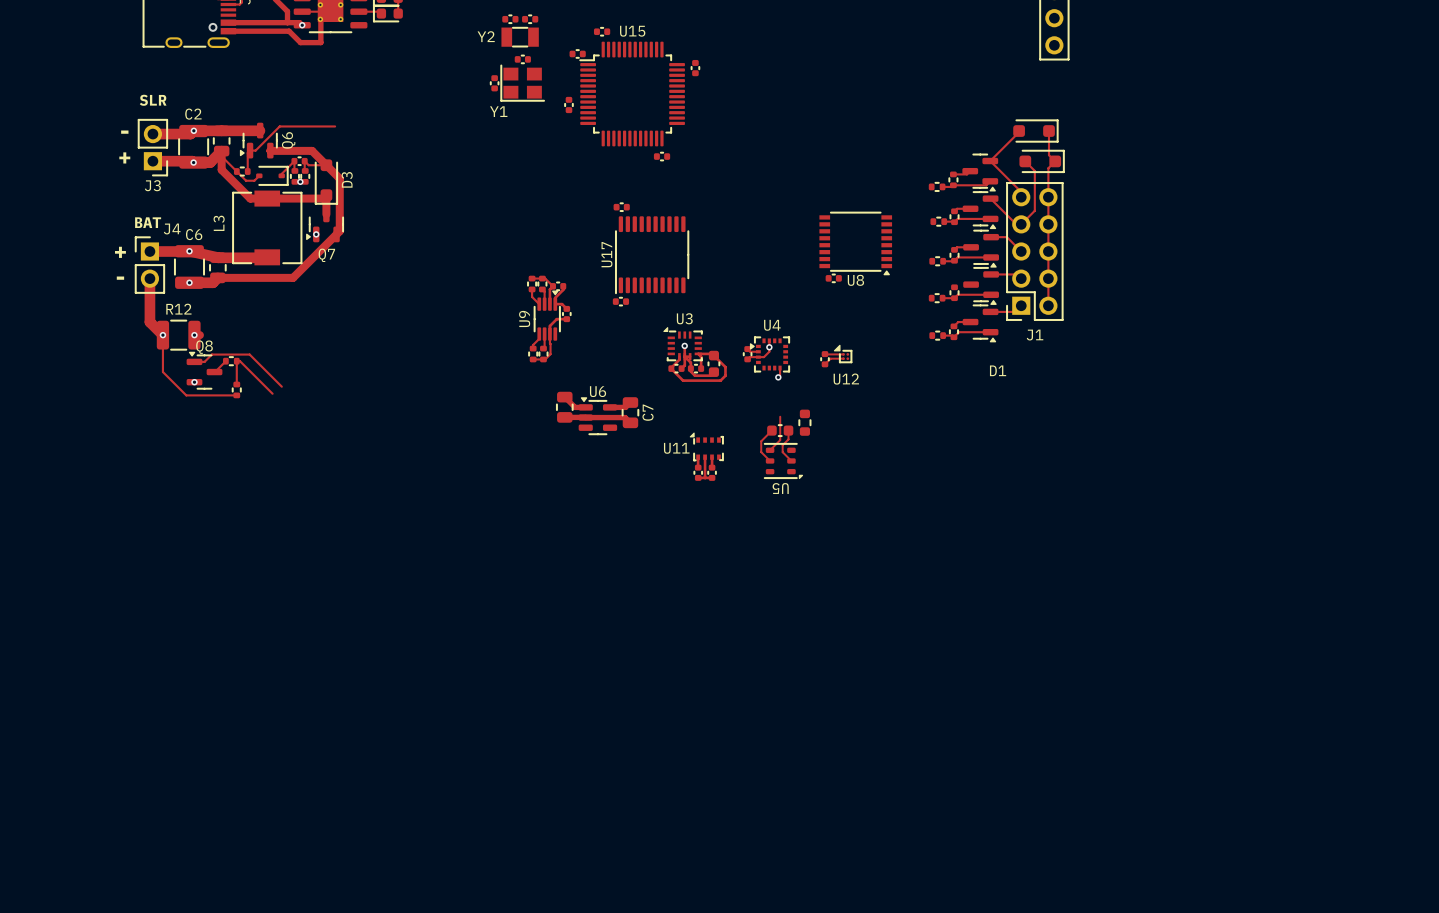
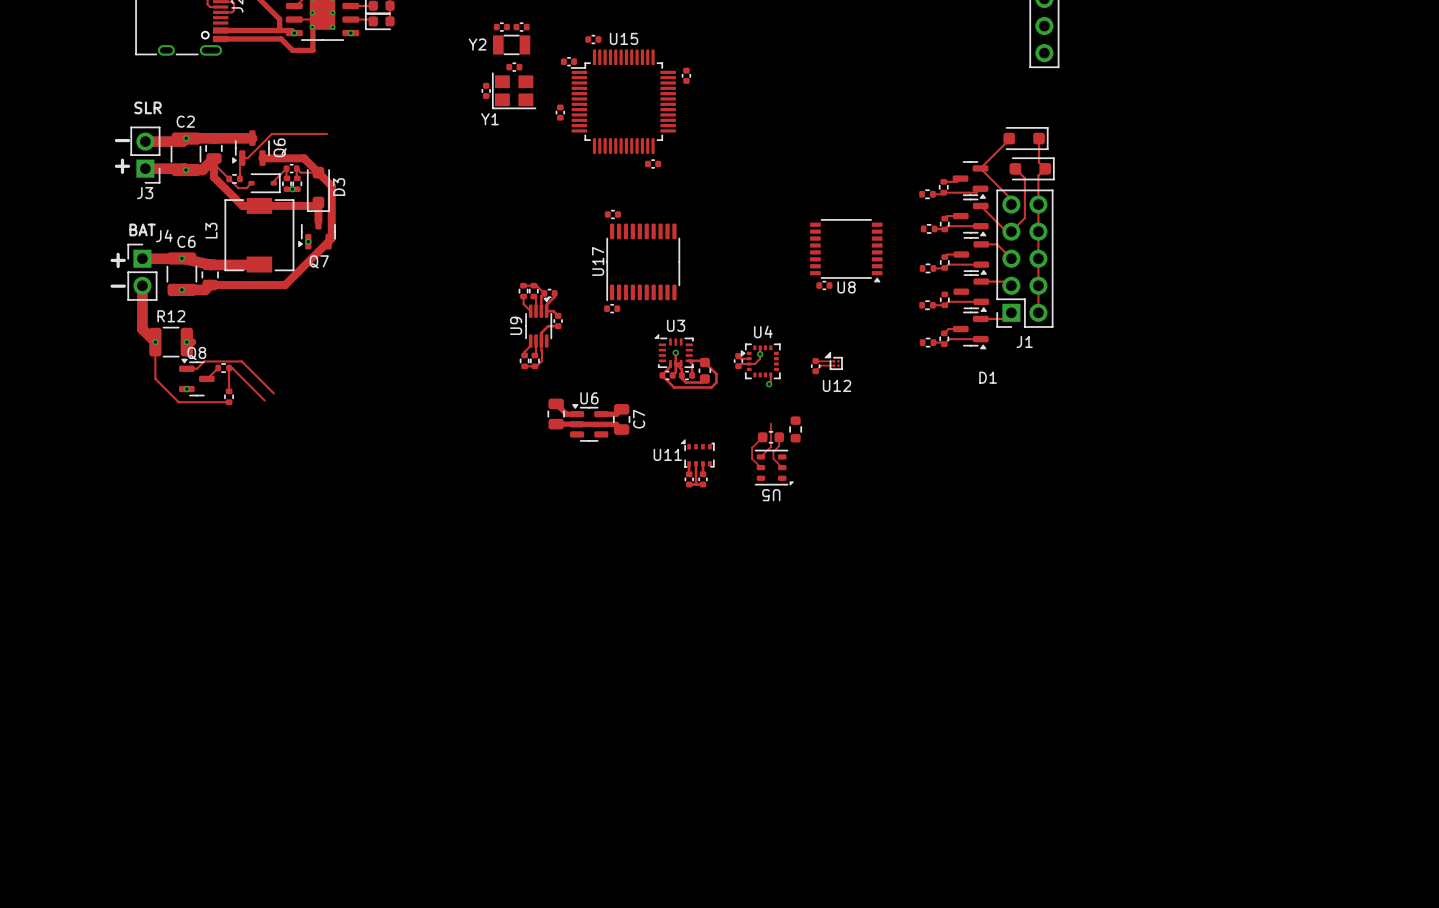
via: none -> (350, 33)

